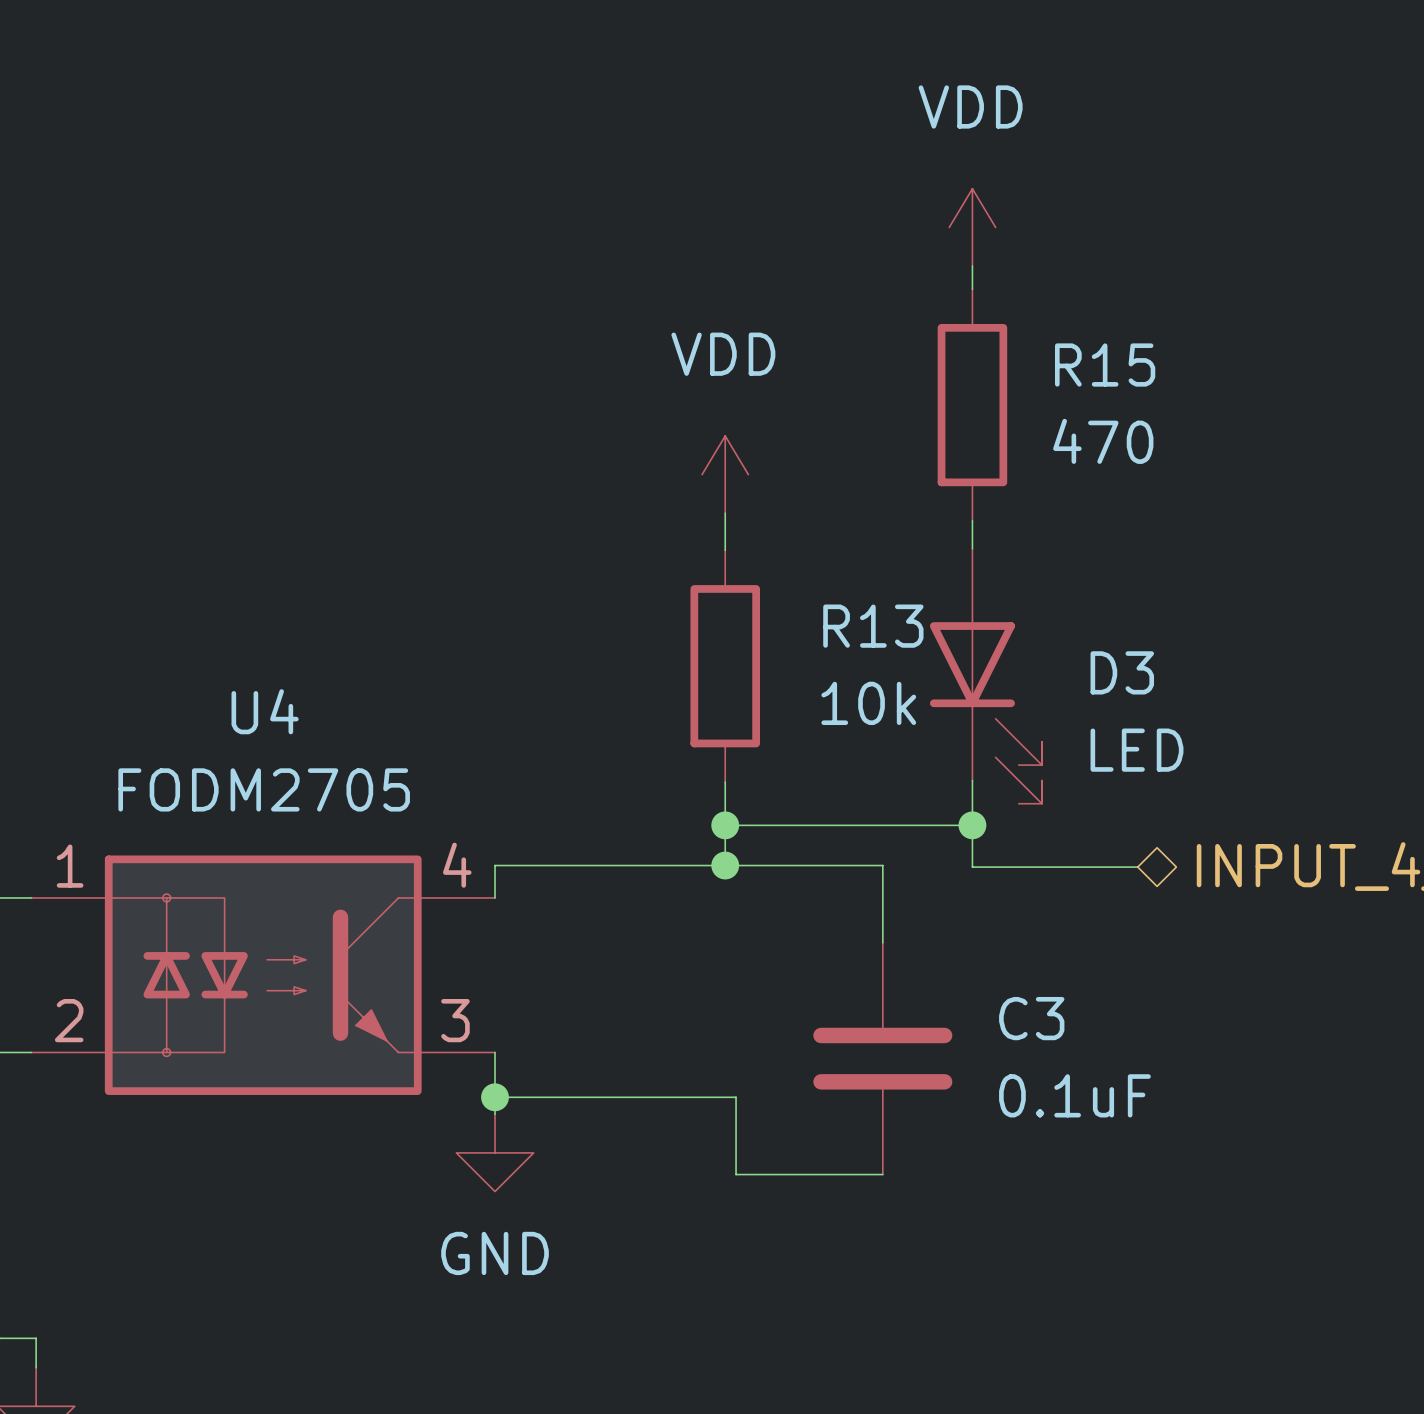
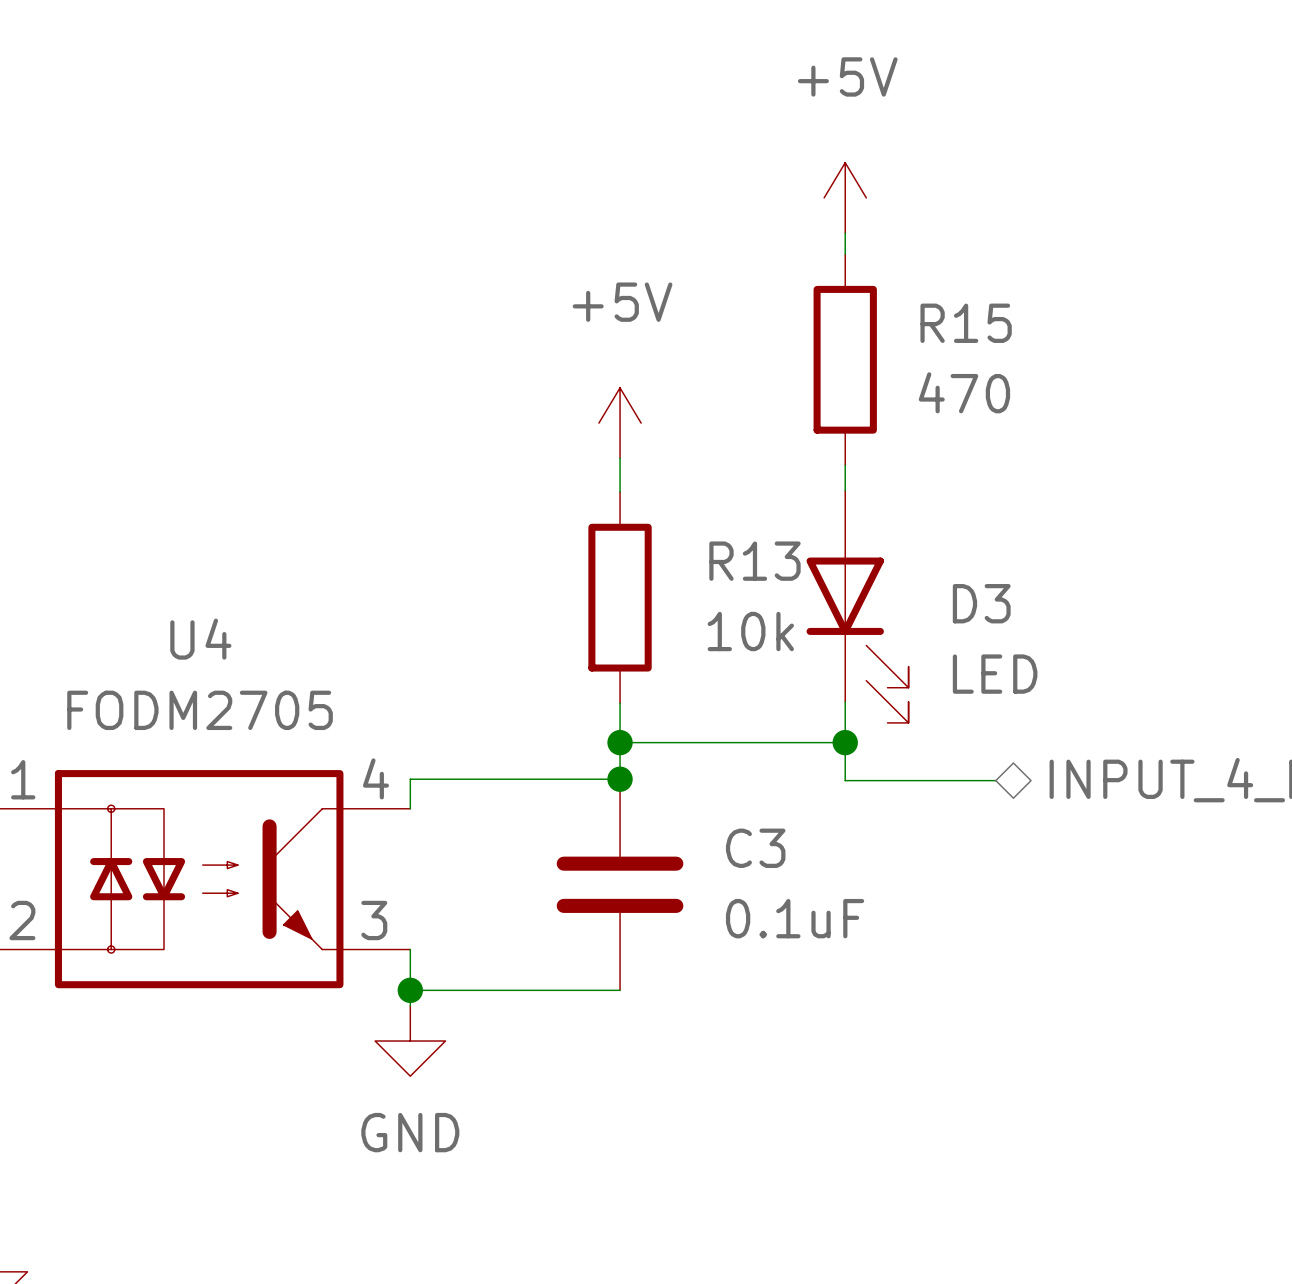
power symbol: VDD (972, 227) -> +5V (845, 197)
power symbol: VDD (725, 474) -> +5V (620, 423)
wire: (725, 863) (725, 865) (882, 865) (882, 942) -> none
C3 position: (882, 1058) -> (620, 884)
wire: (725, 1097) (736, 1097) (736, 1174) (882, 1174) -> none

